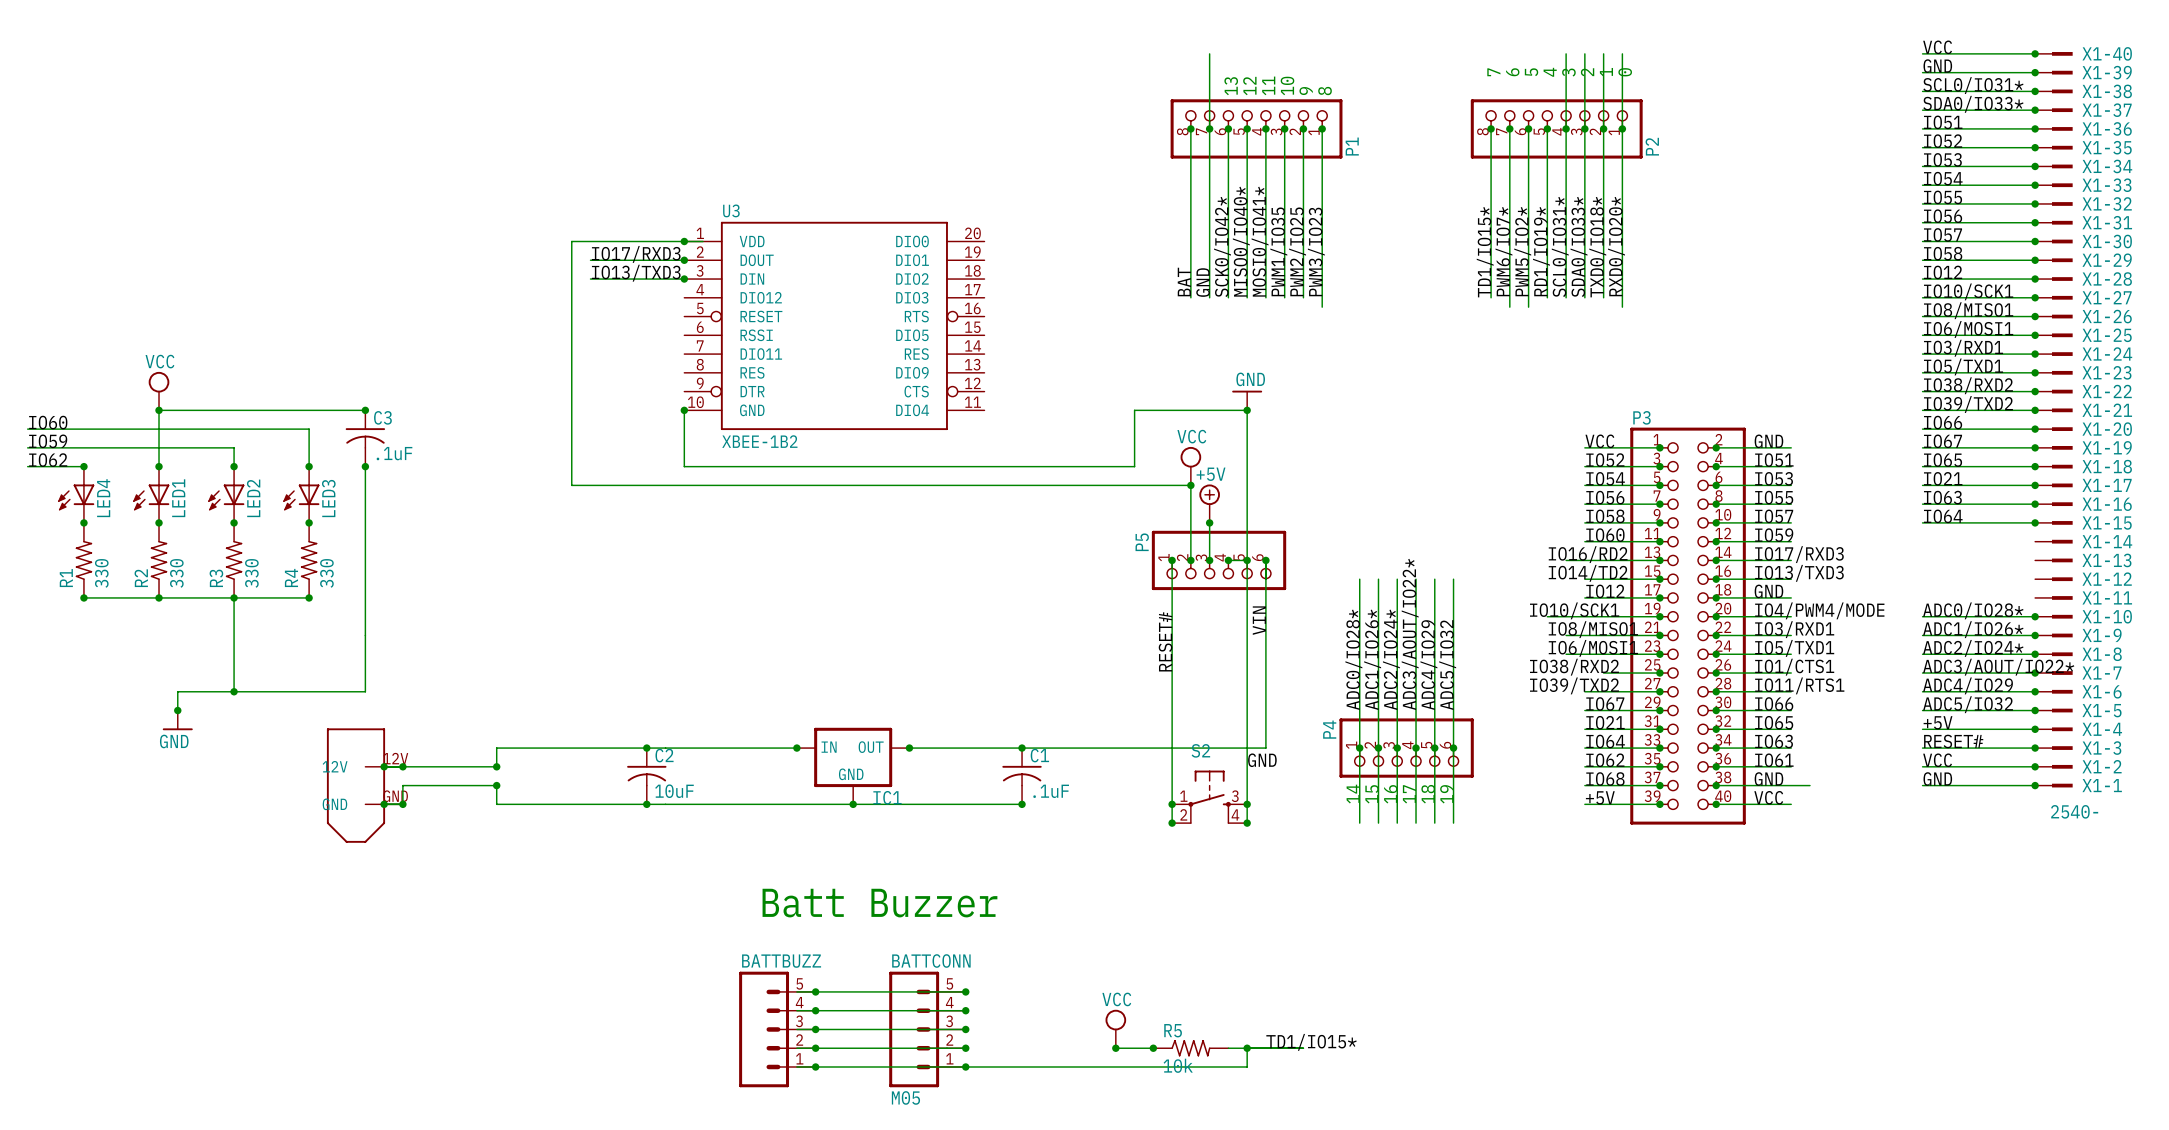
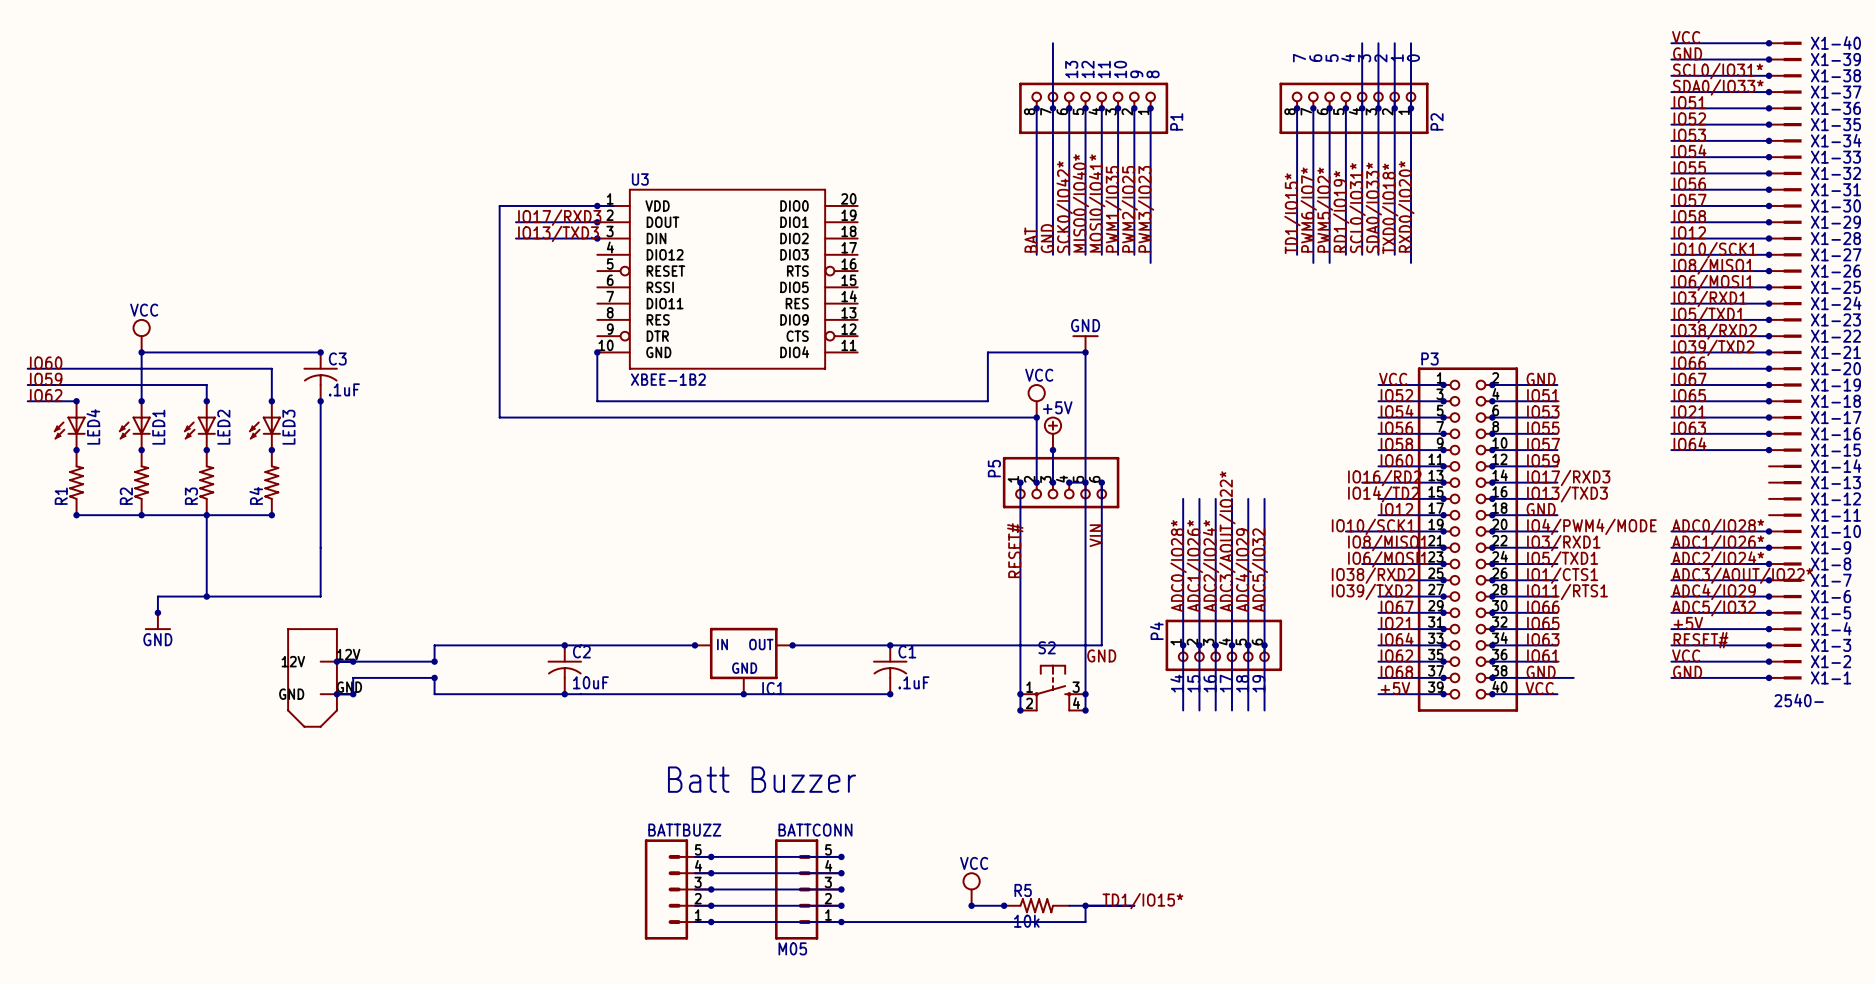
R1 value: 330 (101, 573) -> none
R2 value: 330 (176, 573) -> none
R3 value: 330 (251, 573) -> none
R4 value: 330 (326, 573) -> none

